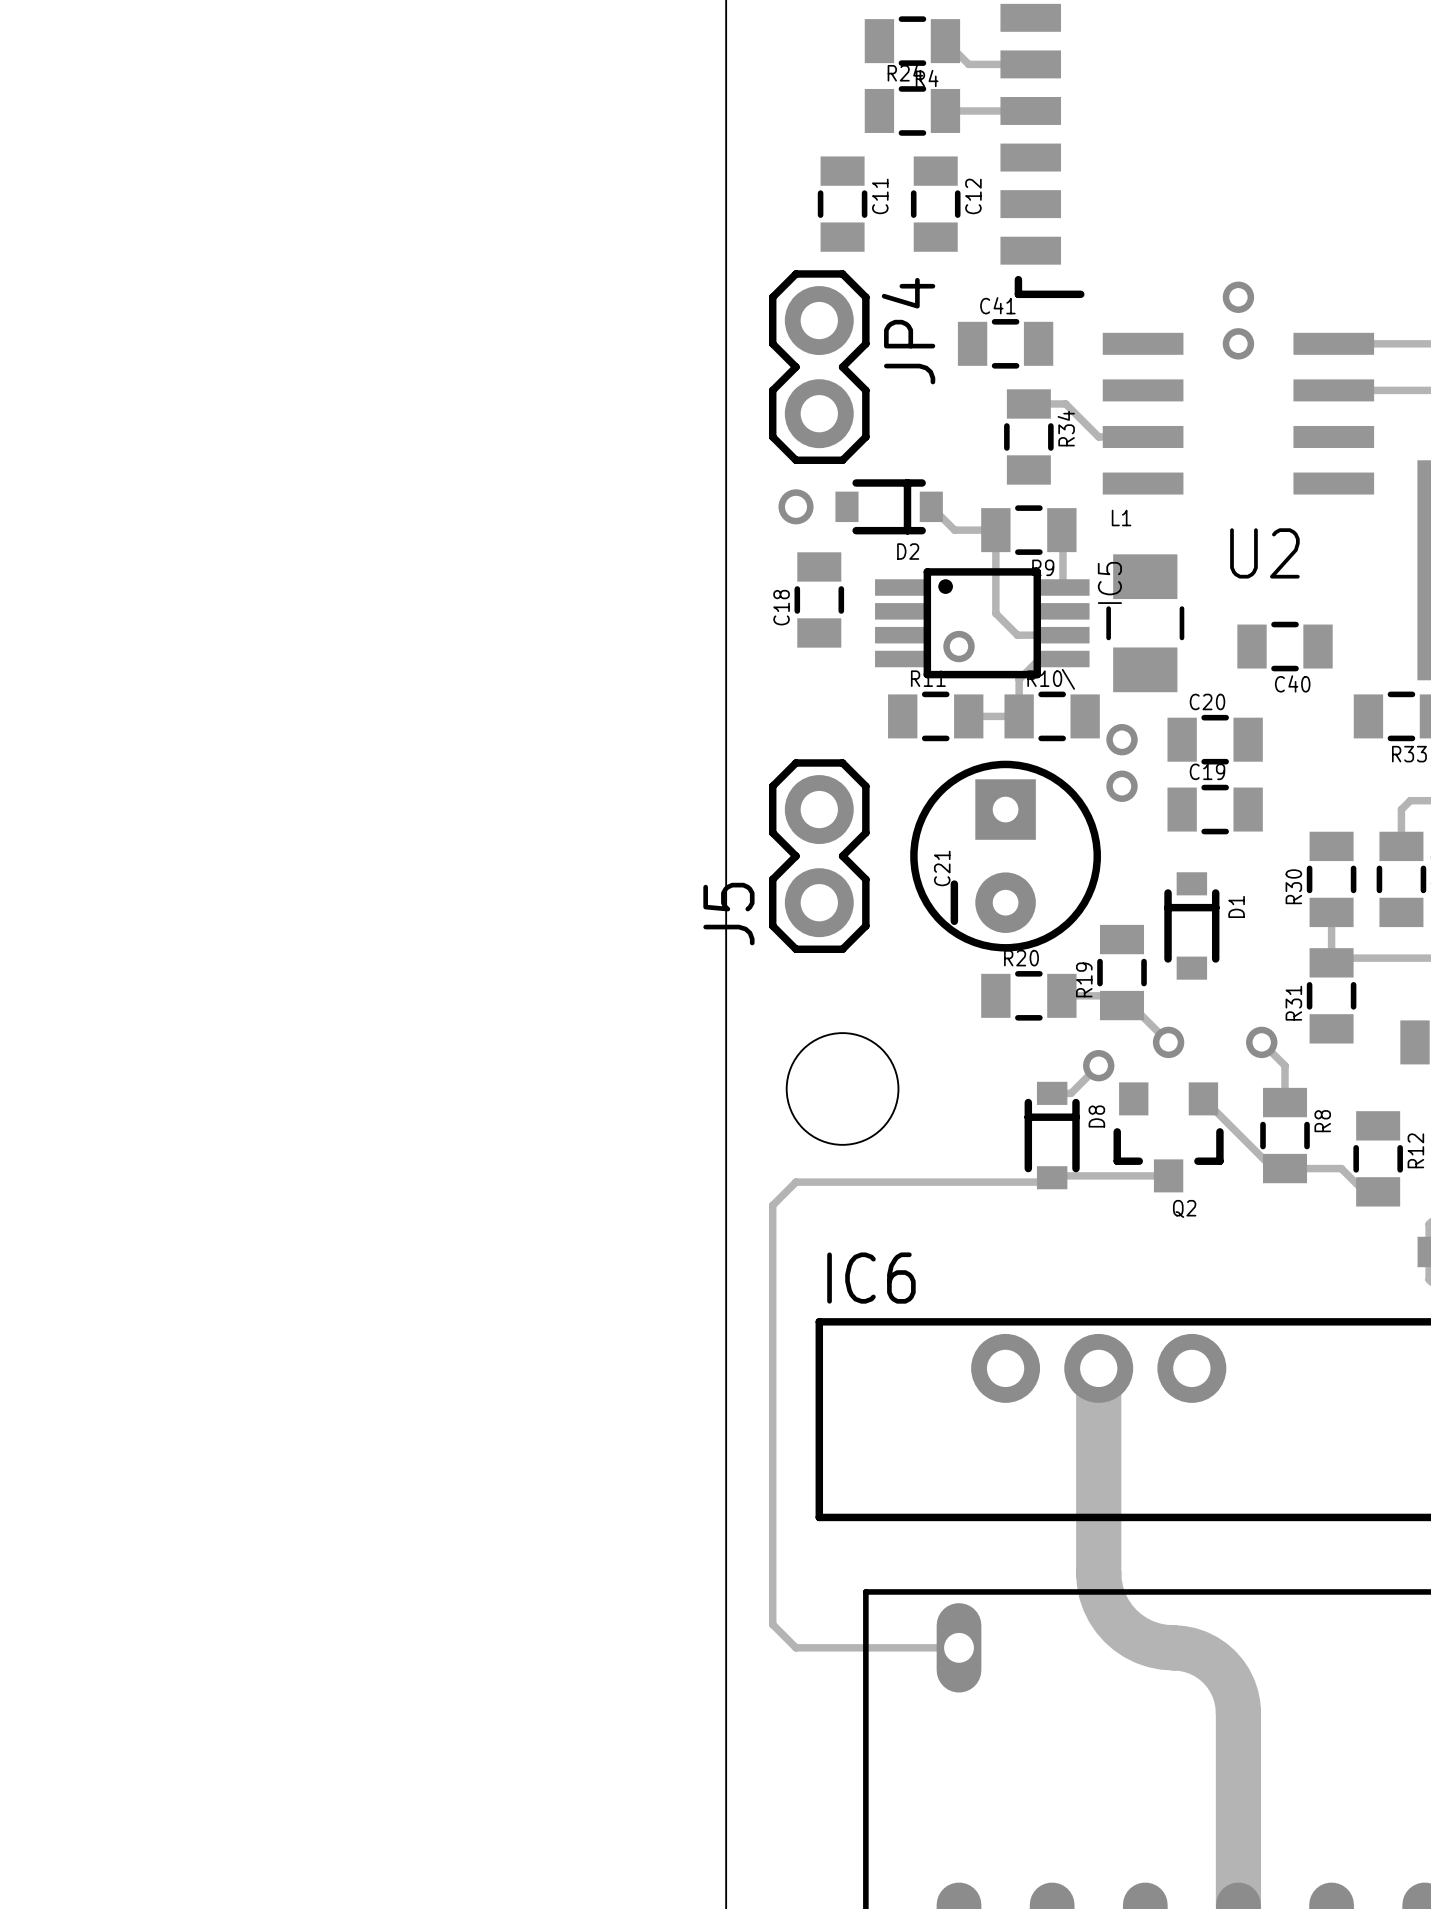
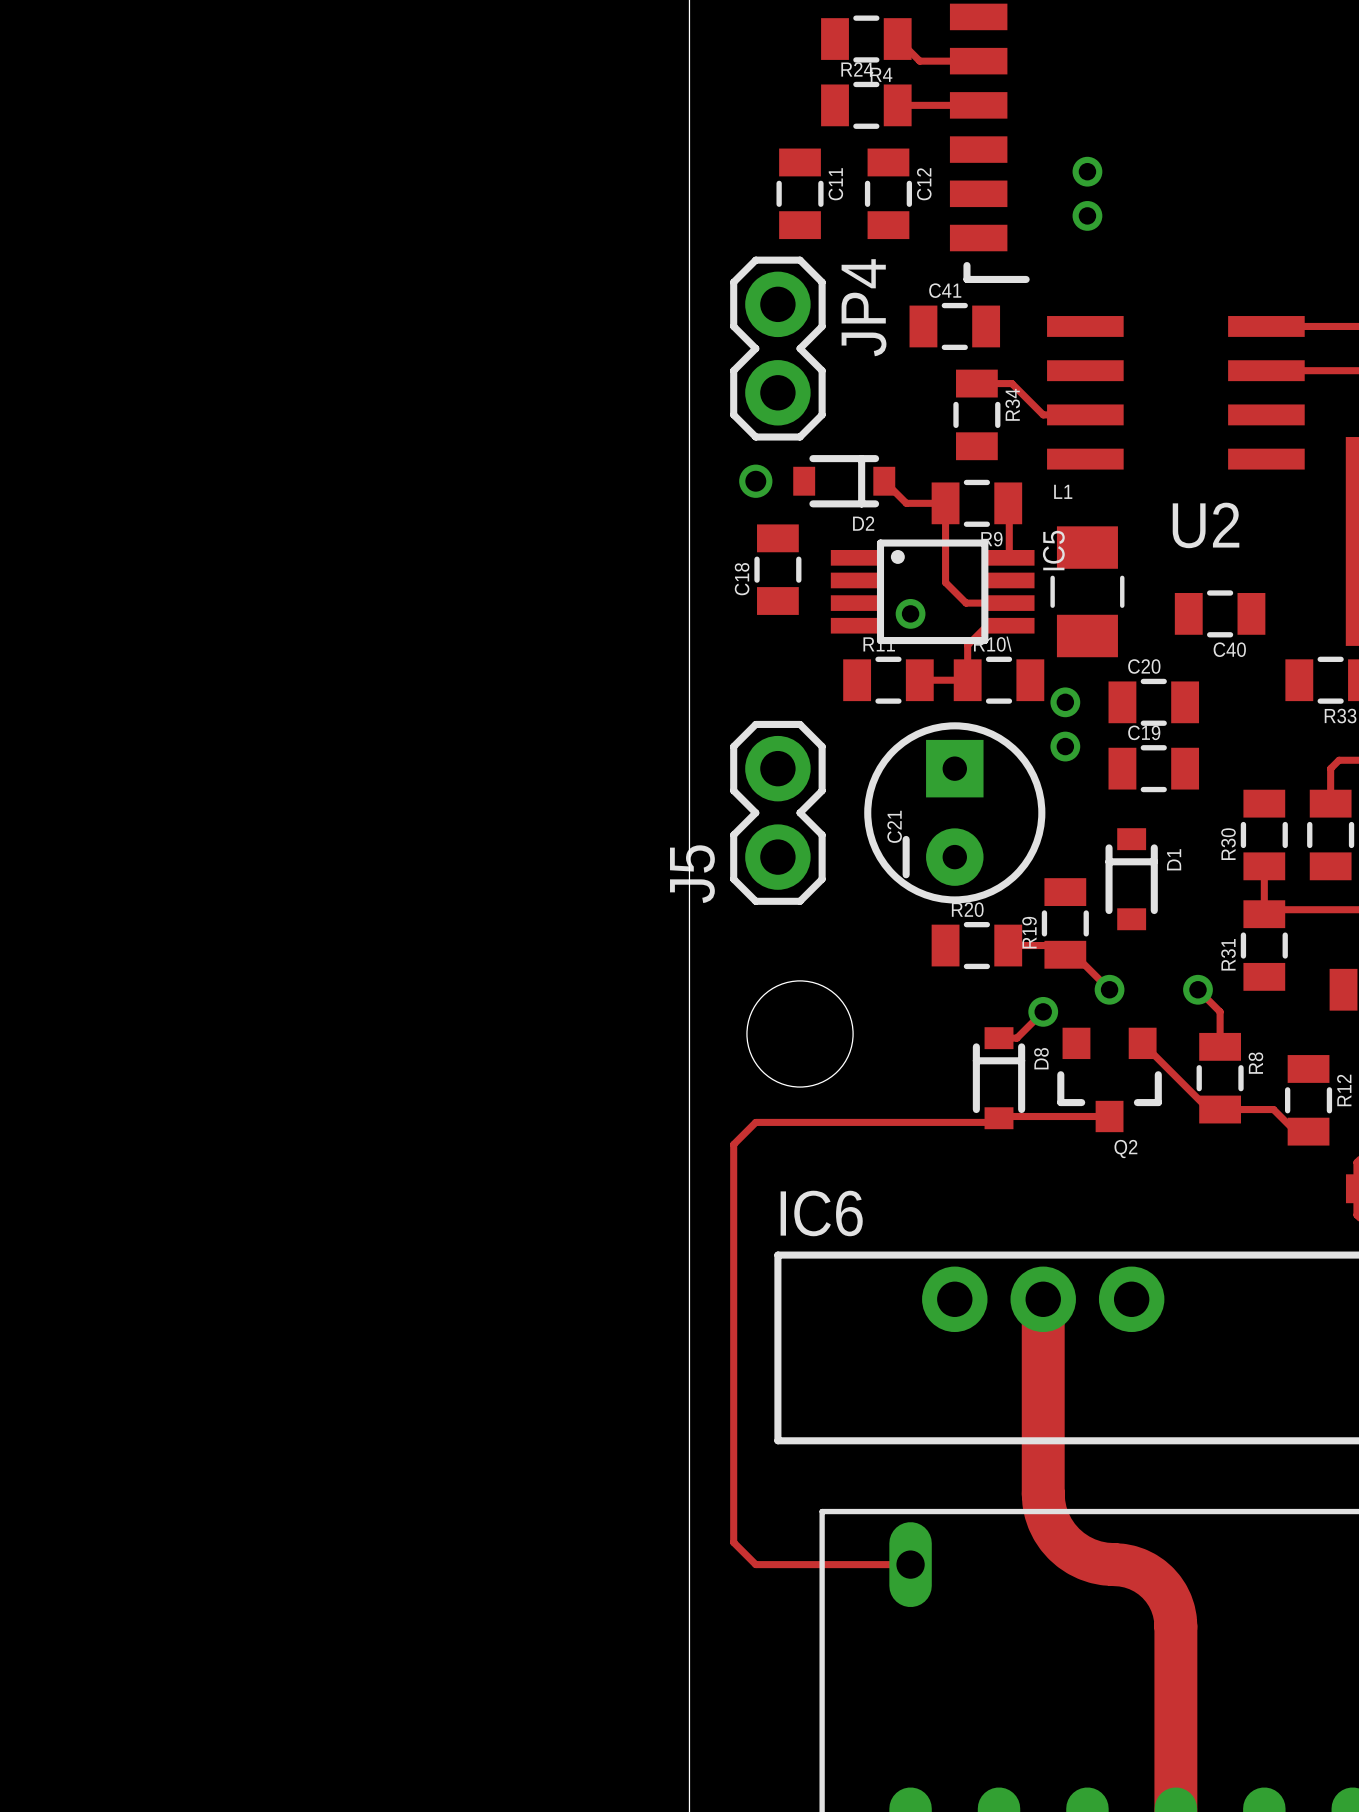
via: none -> (1087, 171)
via: none -> (1087, 215)
via: (1238, 297) -> none
via: (1238, 343) -> none

